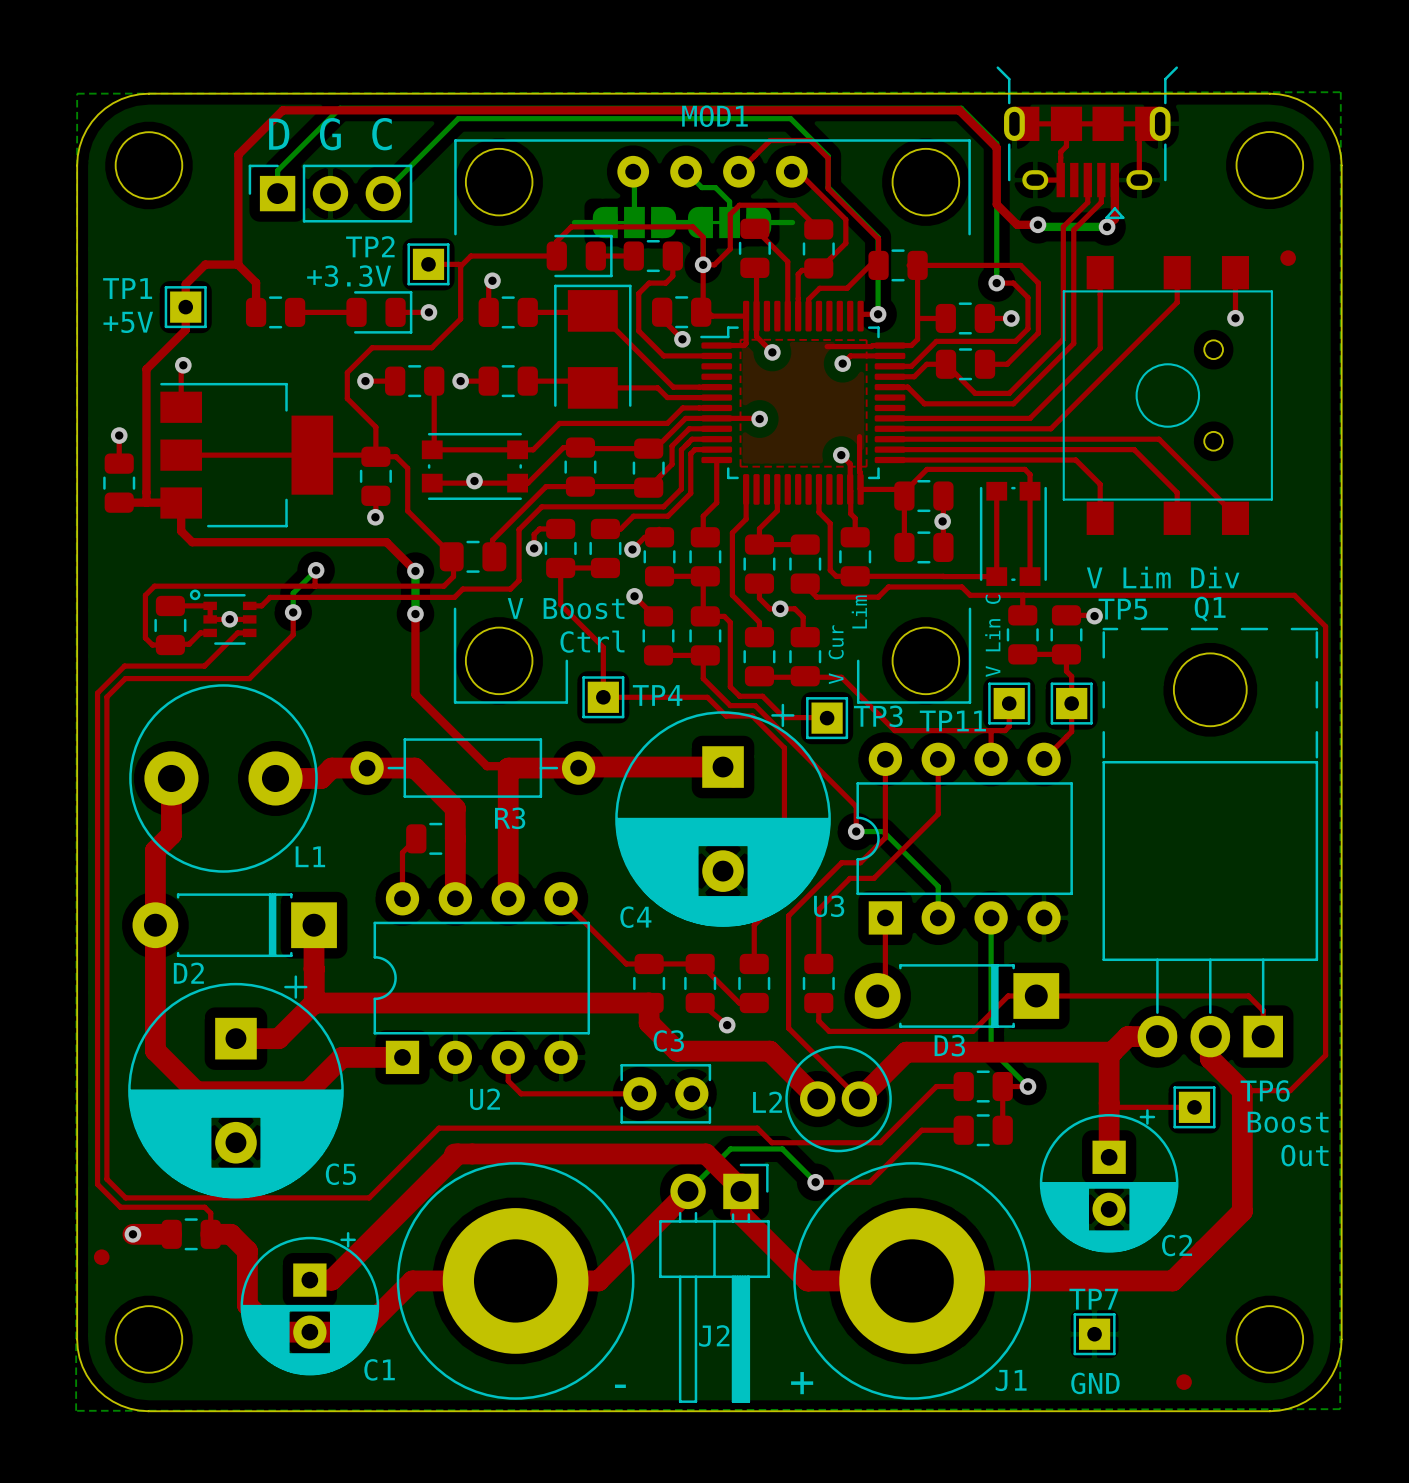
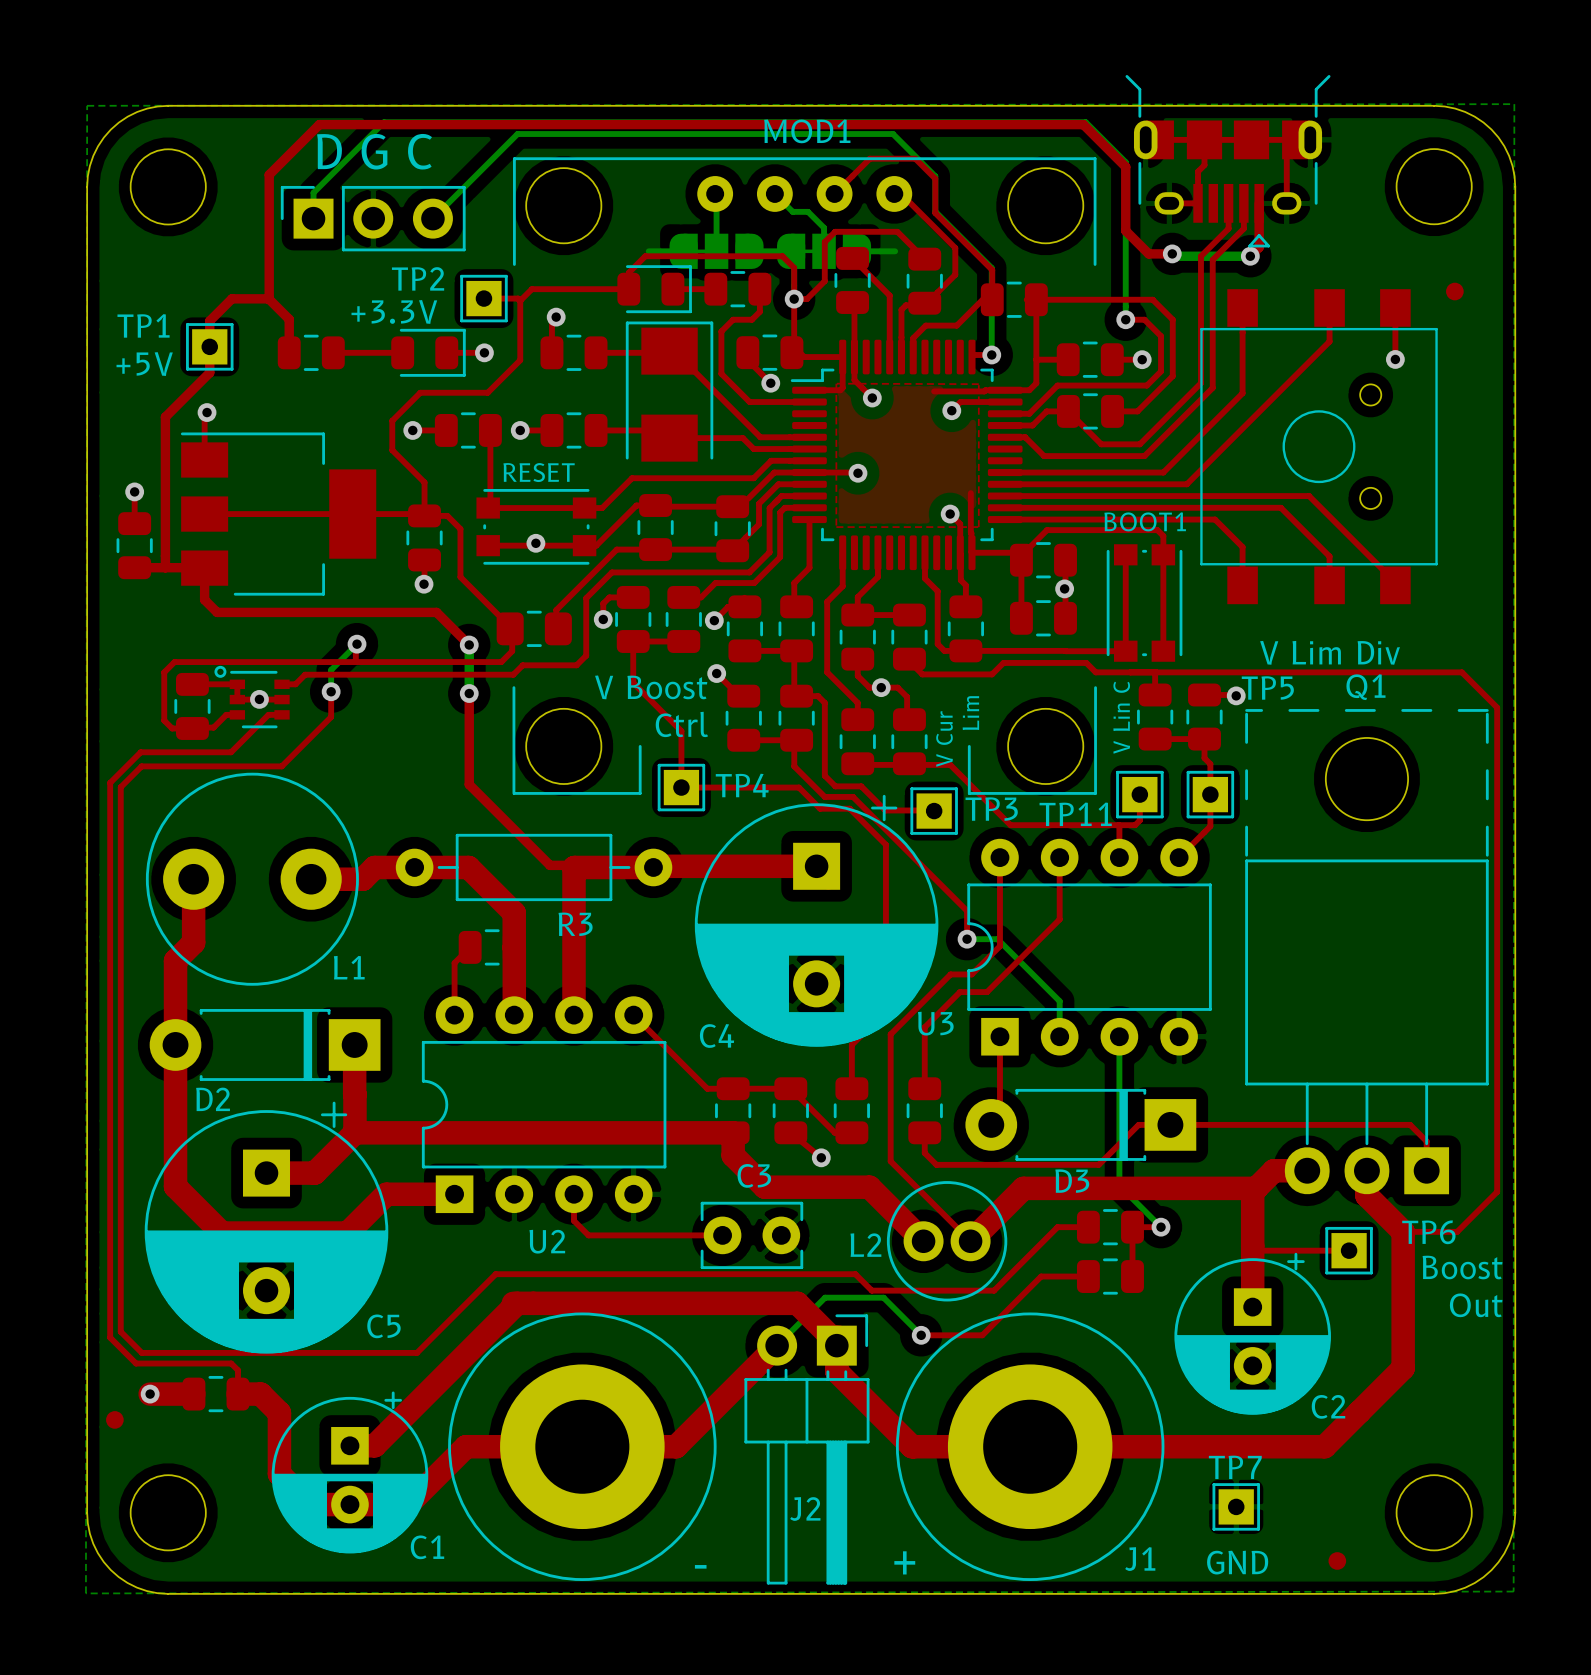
text: none -> RESET (539, 472)
text: none -> BOOT1 (1145, 521)

